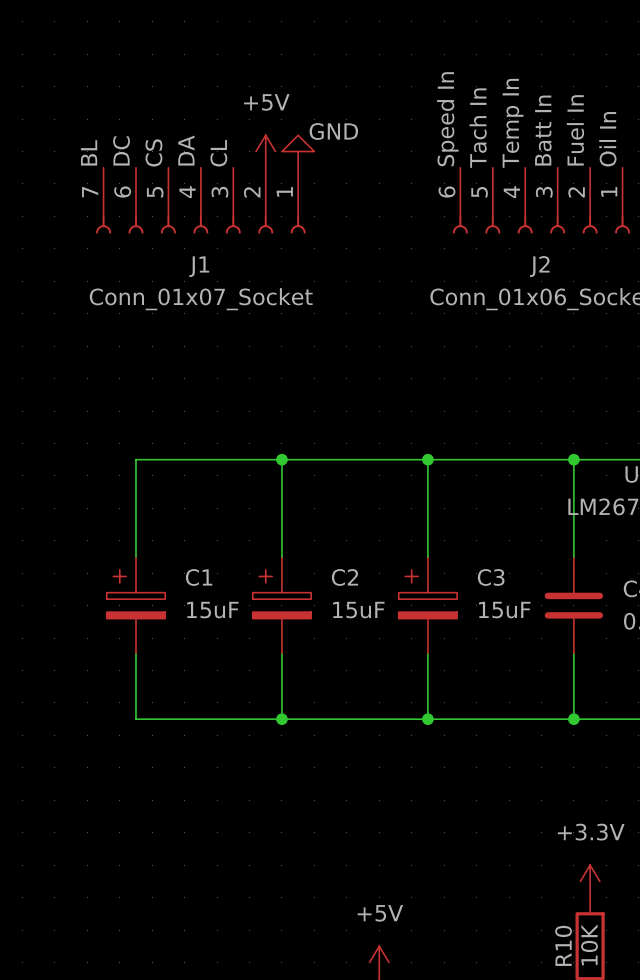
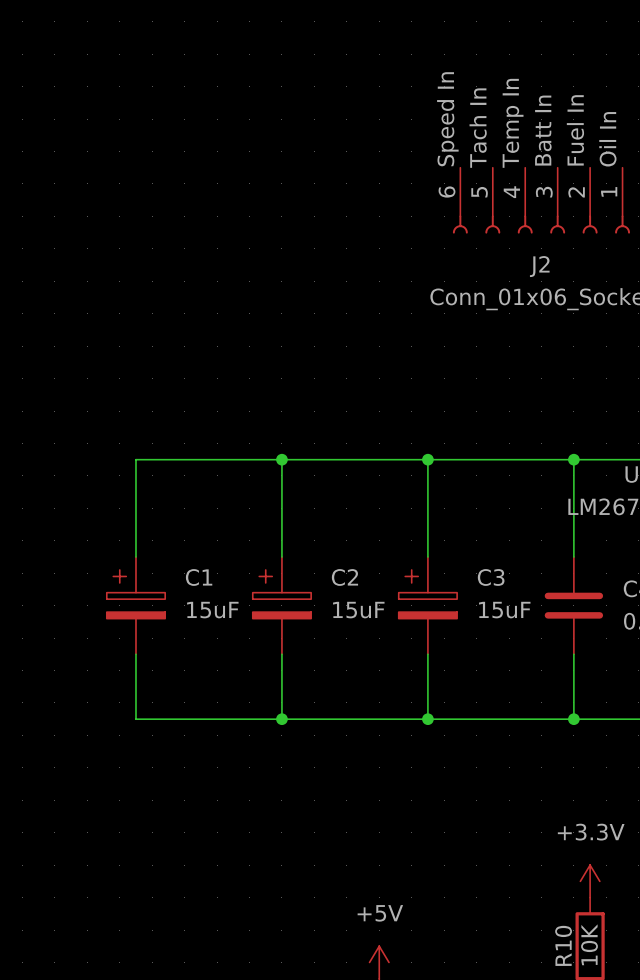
label: DC (121, 150) -> none
label: DA (186, 150) -> none
power symbol: +5V (265, 151) -> none
power symbol: GND (298, 151) -> none
label: BL (89, 152) -> none
label: CS (153, 152) -> none
label: CL (218, 153) -> none
J1: Conn_01x07_Socket (200, 200) -> none

